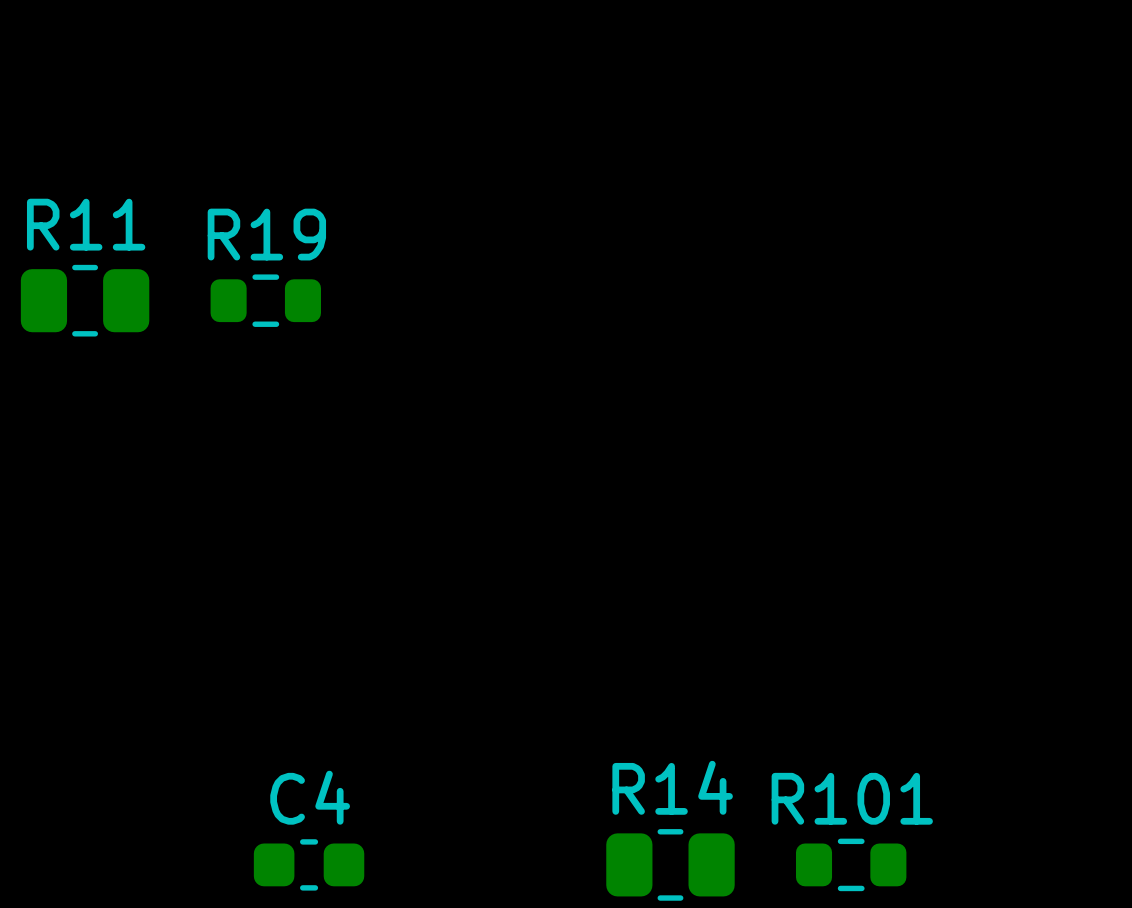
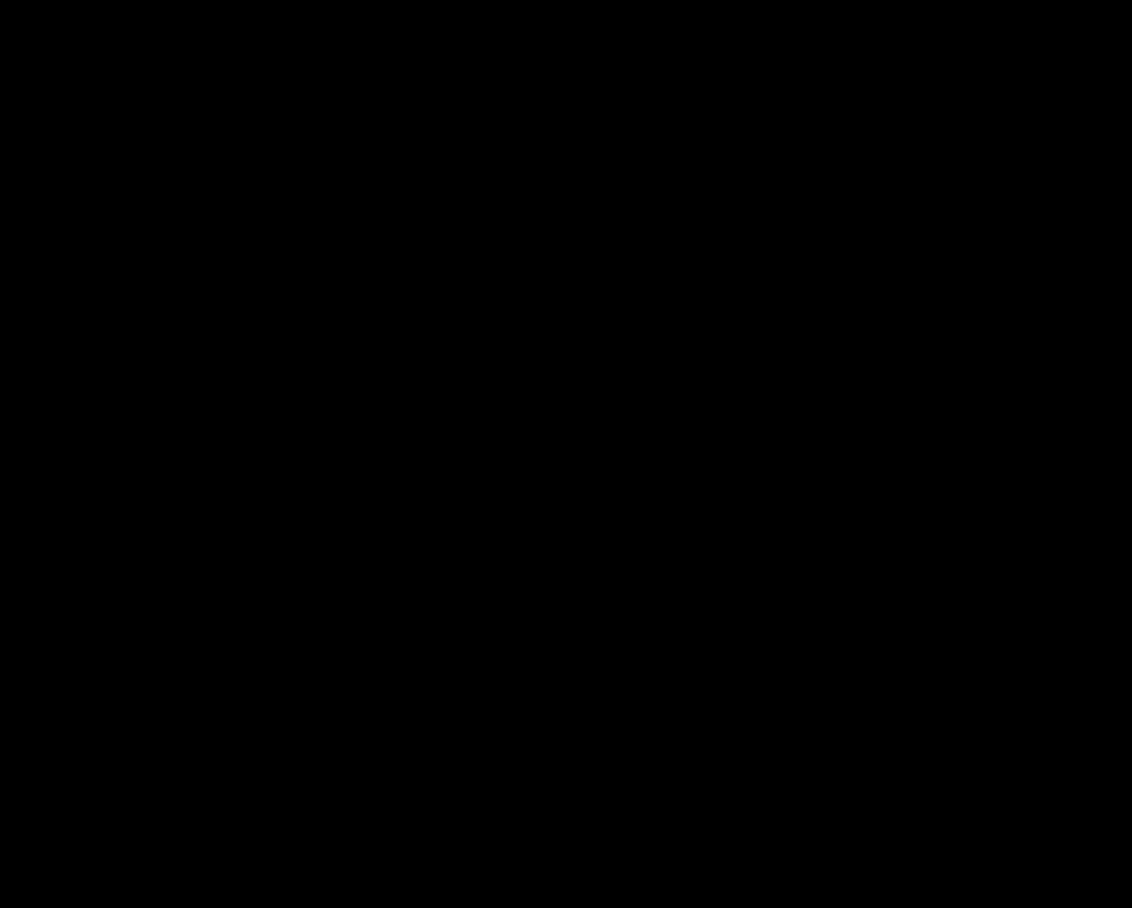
R11: (85, 300) -> none
R19: (265, 300) -> none
C4: (309, 864) -> none
R14: (670, 864) -> none
R101: (851, 864) -> none

